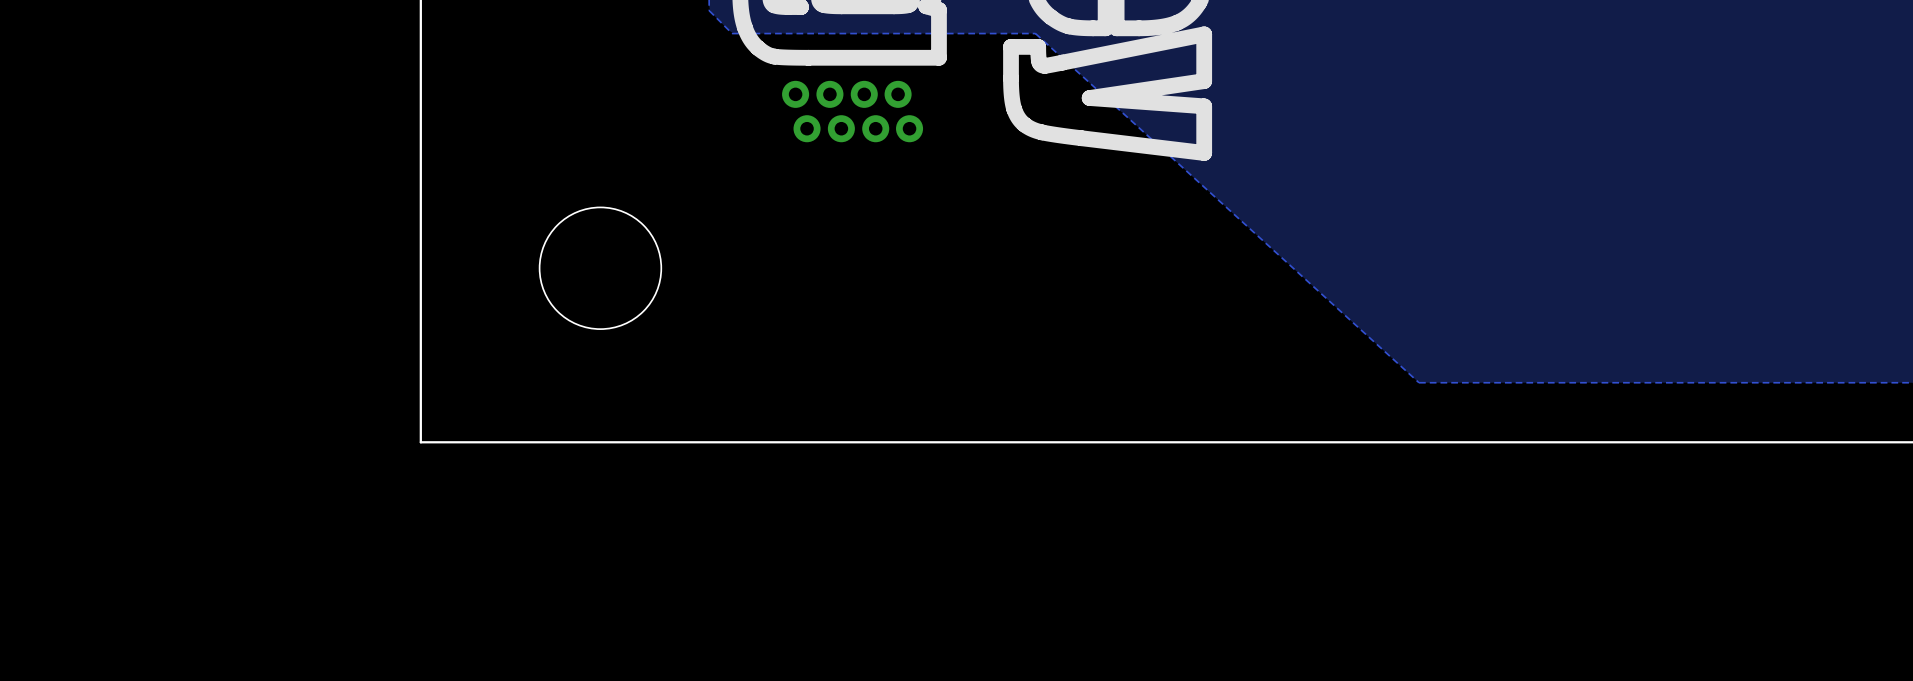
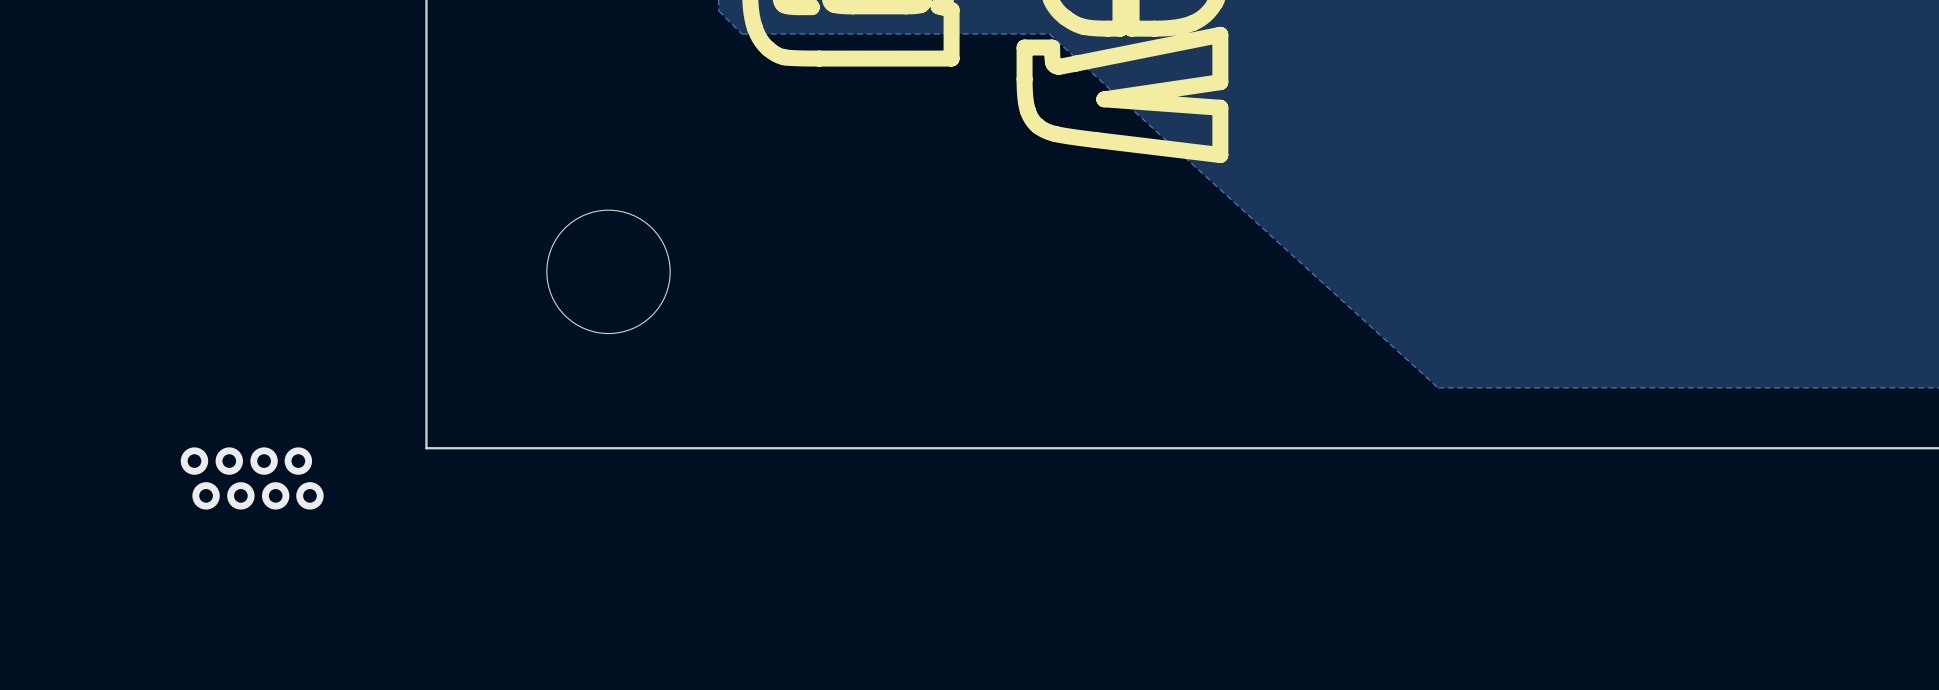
via: (795, 94) -> none
via: (829, 94) -> none
via: (864, 94) -> none
via: (898, 94) -> none
via: (807, 128) -> none
via: (841, 128) -> none
via: (875, 128) -> none
via: (909, 128) -> none
via: none -> (194, 461)
via: none -> (229, 461)
via: none -> (264, 461)
via: none -> (298, 461)
via: none -> (206, 495)
via: none -> (240, 495)
via: none -> (275, 495)
via: none -> (309, 495)

